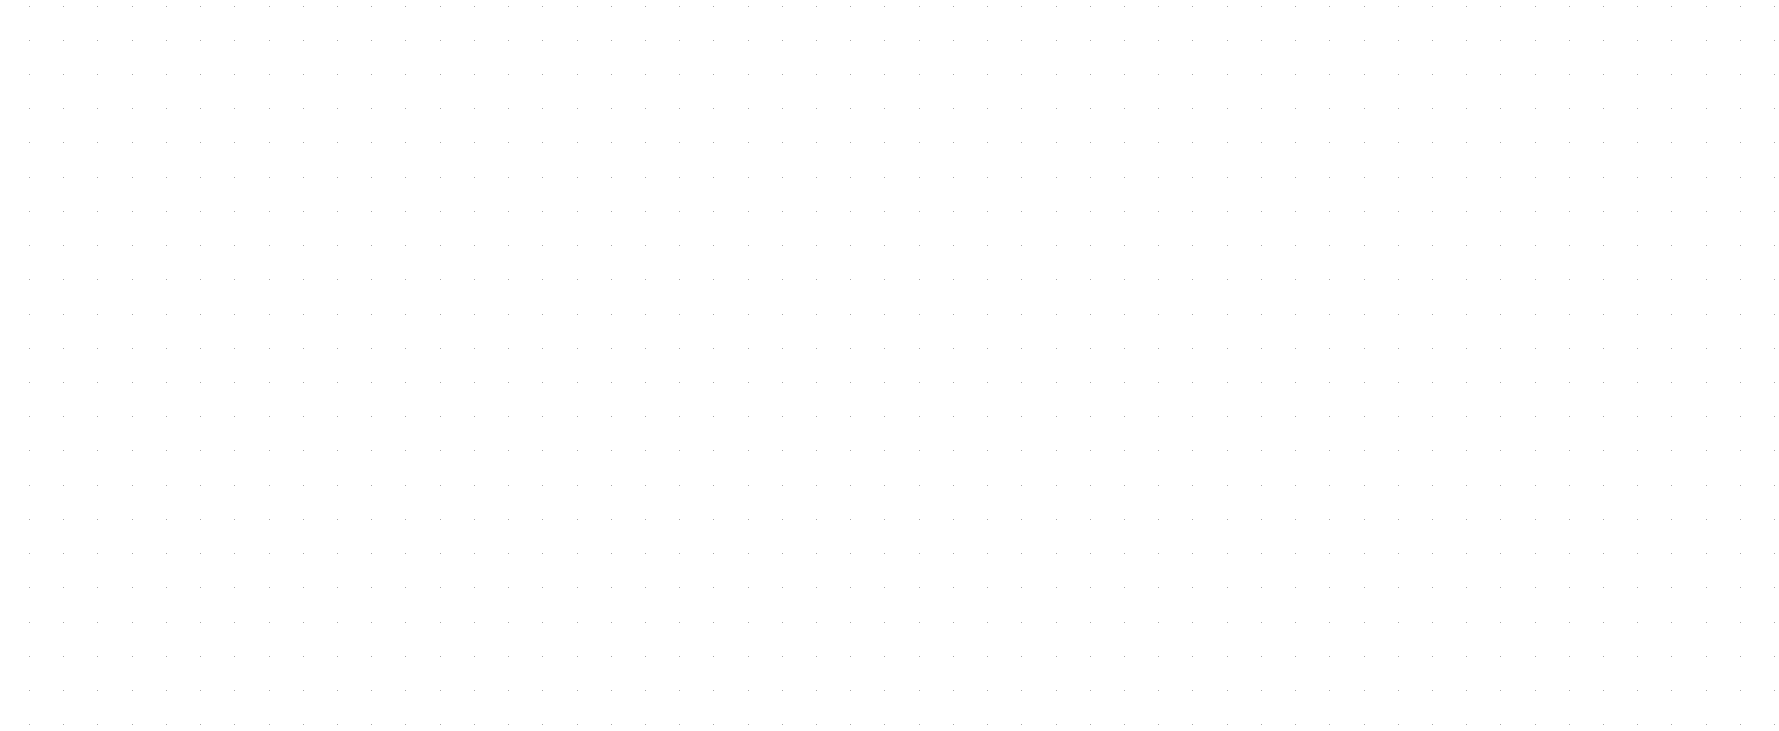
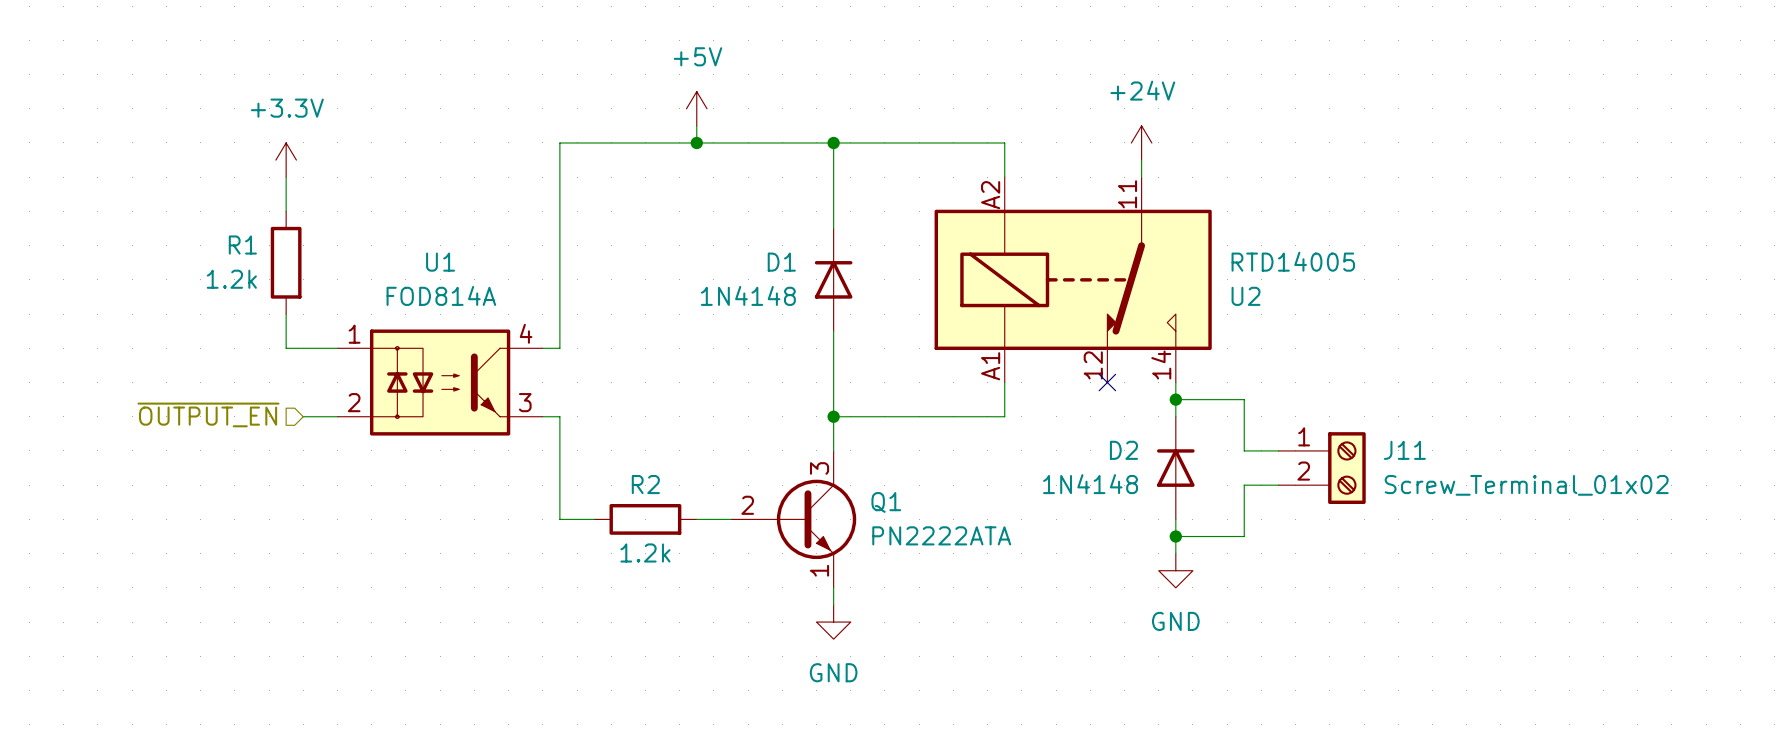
power symbol: none -> +5V (696, 108)
wire: none -> (696, 125) (696, 142)
junction: none -> (696, 142)
wire: none -> (833, 142) (833, 228)
junction: none -> (833, 142)
power symbol: none -> +24V (1141, 142)
power symbol: none -> +3.3V (286, 160)
wire: none -> (1141, 160) (1141, 177)
wire: none -> (286, 177) (286, 211)
wire: none -> (1004, 177) (1004, 142) (559, 142) (559, 348) (542, 348)
R1: none -> 1.2k (286, 262)
D1: none -> 1N4148 (833, 279)
U2: none -> RTD14005 (1073, 279)
wire: none -> (286, 314) (286, 348) (337, 348)
wire: none -> (833, 331) (833, 450)
U1: none -> FOD814A (440, 382)
wire: none -> (1004, 382) (1004, 416) (833, 416)
no-connect mark: none -> (1107, 382)
wire: none -> (1175, 382) (1175, 416)
wire: none -> (1175, 399) (1244, 399) (1244, 450) (1278, 450)
junction: none -> (1175, 399)
hierarchical label: none -> ~{OUTPUT_EN} (208, 414)
wire: none -> (303, 416) (337, 416)
wire: none -> (542, 416) (559, 416) (559, 519) (594, 519)
junction: none -> (833, 416)
D2: none -> 1N4148 (1175, 468)
J11: none -> Screw_Terminal_01x02 (1322, 468)
wire: none -> (1278, 485) (1244, 485) (1244, 536) (1175, 536)
R2: none -> 1.2k (645, 519)
wire: none -> (696, 519) (730, 519)
Q1: none -> PN2222ATA (793, 519)
wire: none -> (1175, 519) (1175, 553)
junction: none -> (1175, 536)
power symbol: none -> GND (1175, 570)
wire: none -> (833, 587) (833, 604)
power symbol: none -> GND (833, 622)

